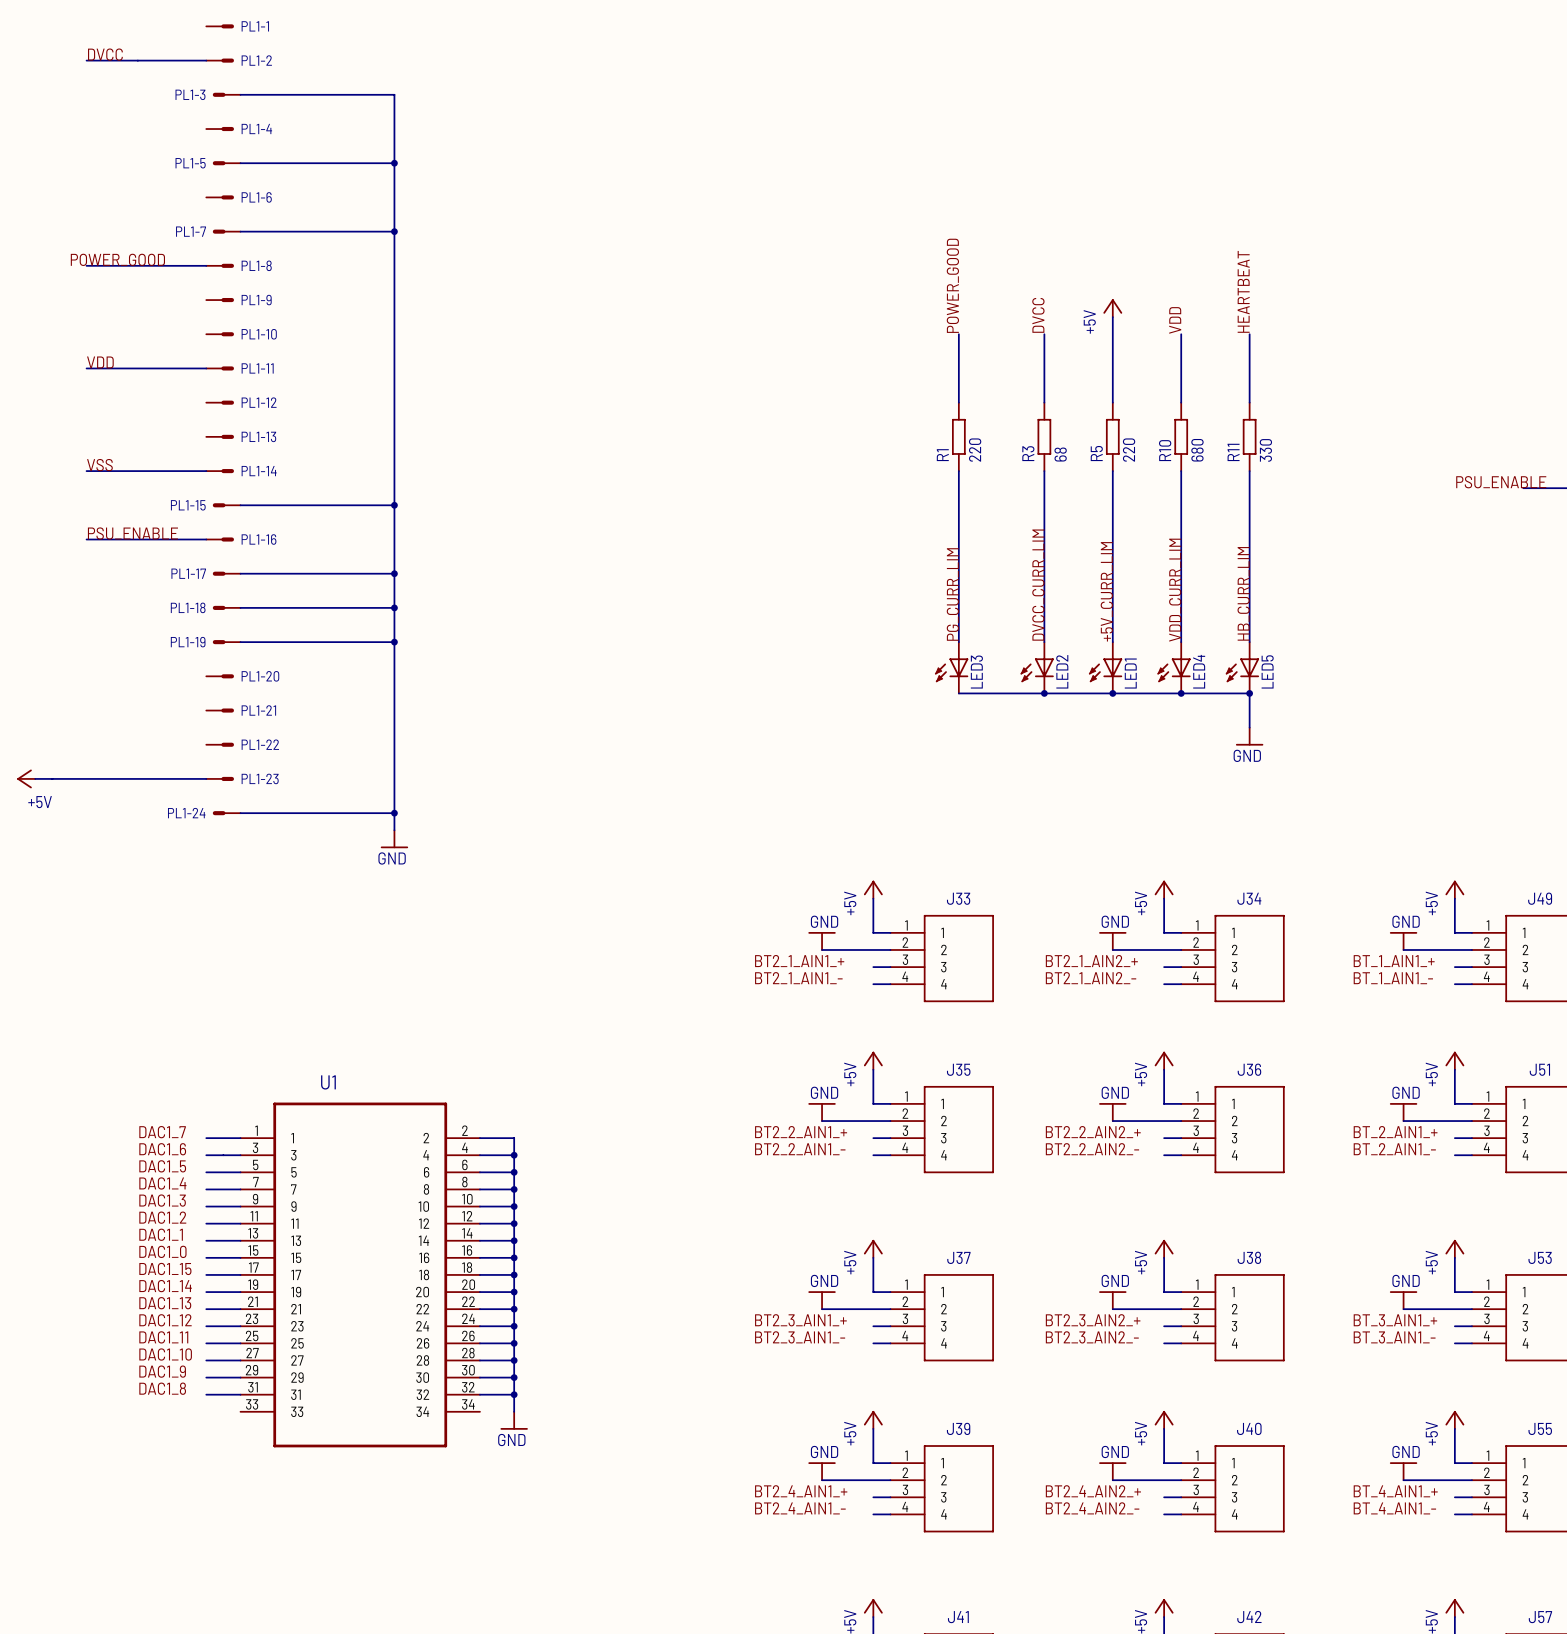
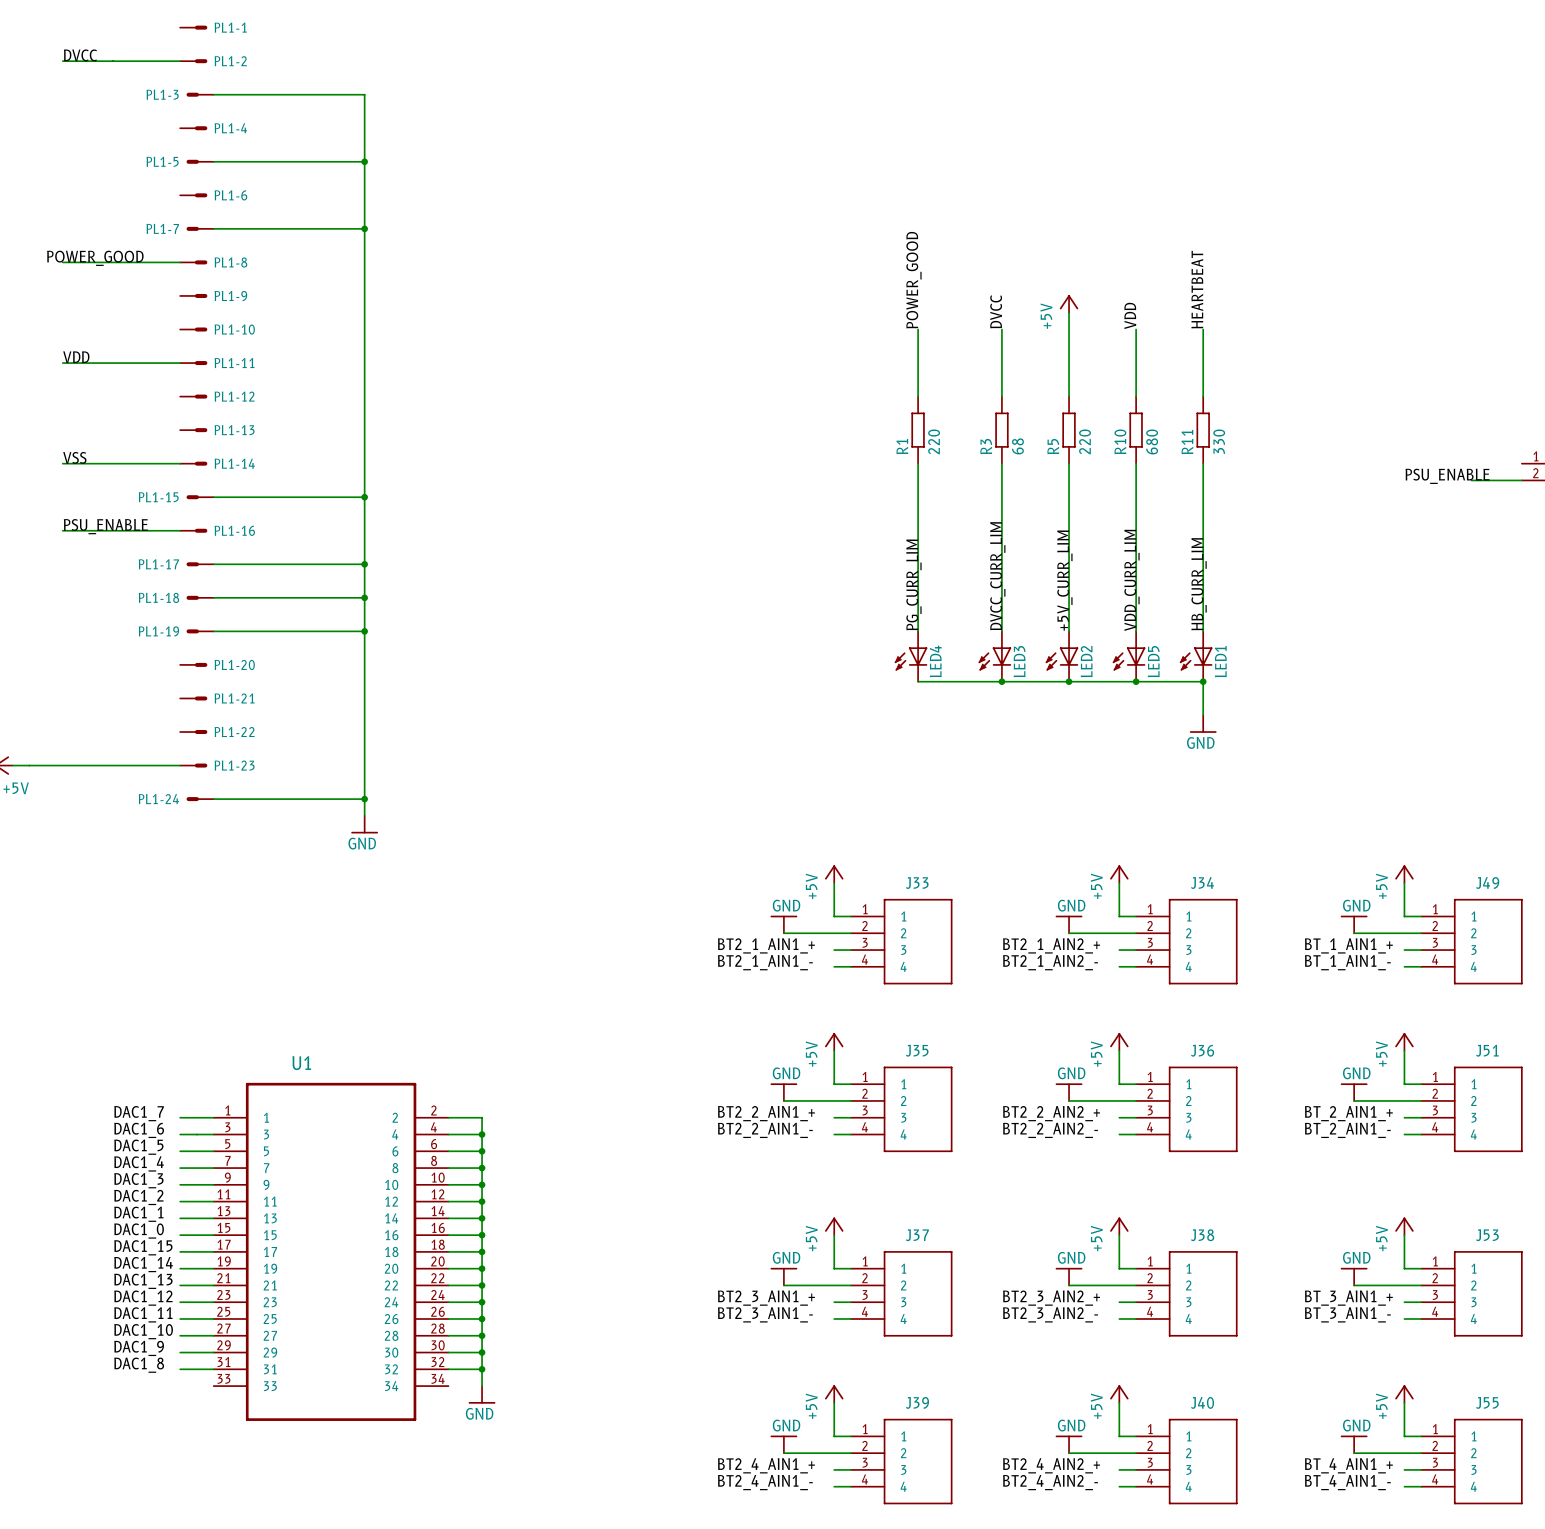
LED2 name: LED2 (1062, 671) -> LED3 (1019, 661)
LED4 name: LED4 (1199, 671) -> LED5 (1153, 661)
LED5 name: LED5 (1267, 671) -> LED1 (1220, 661)
LED3 name: LED3 (976, 672) -> LED4 (935, 661)
LED1 name: LED1 (1130, 673) -> LED2 (1086, 661)

